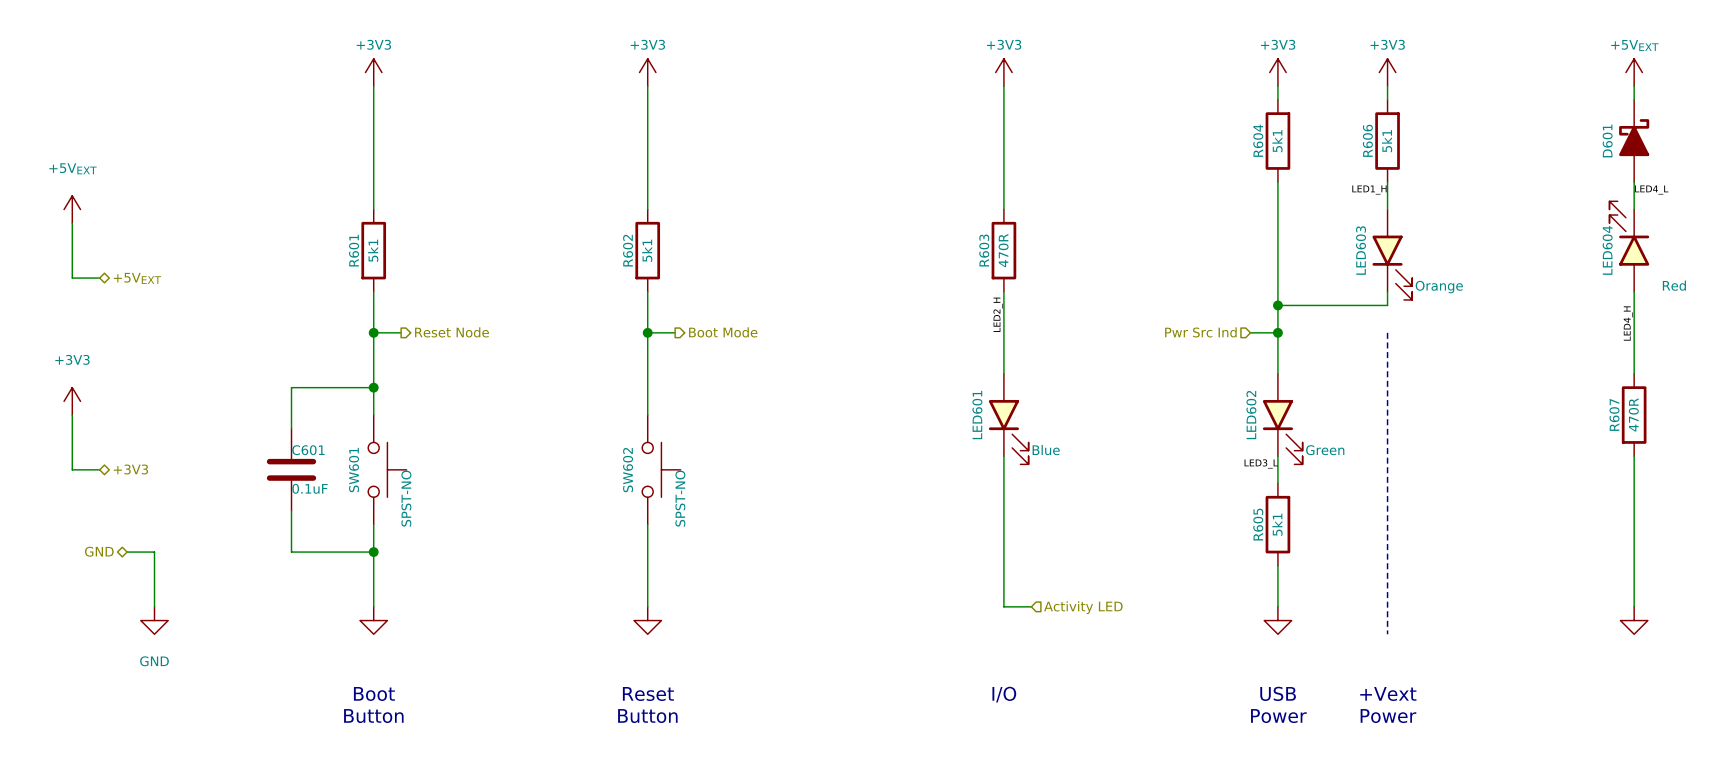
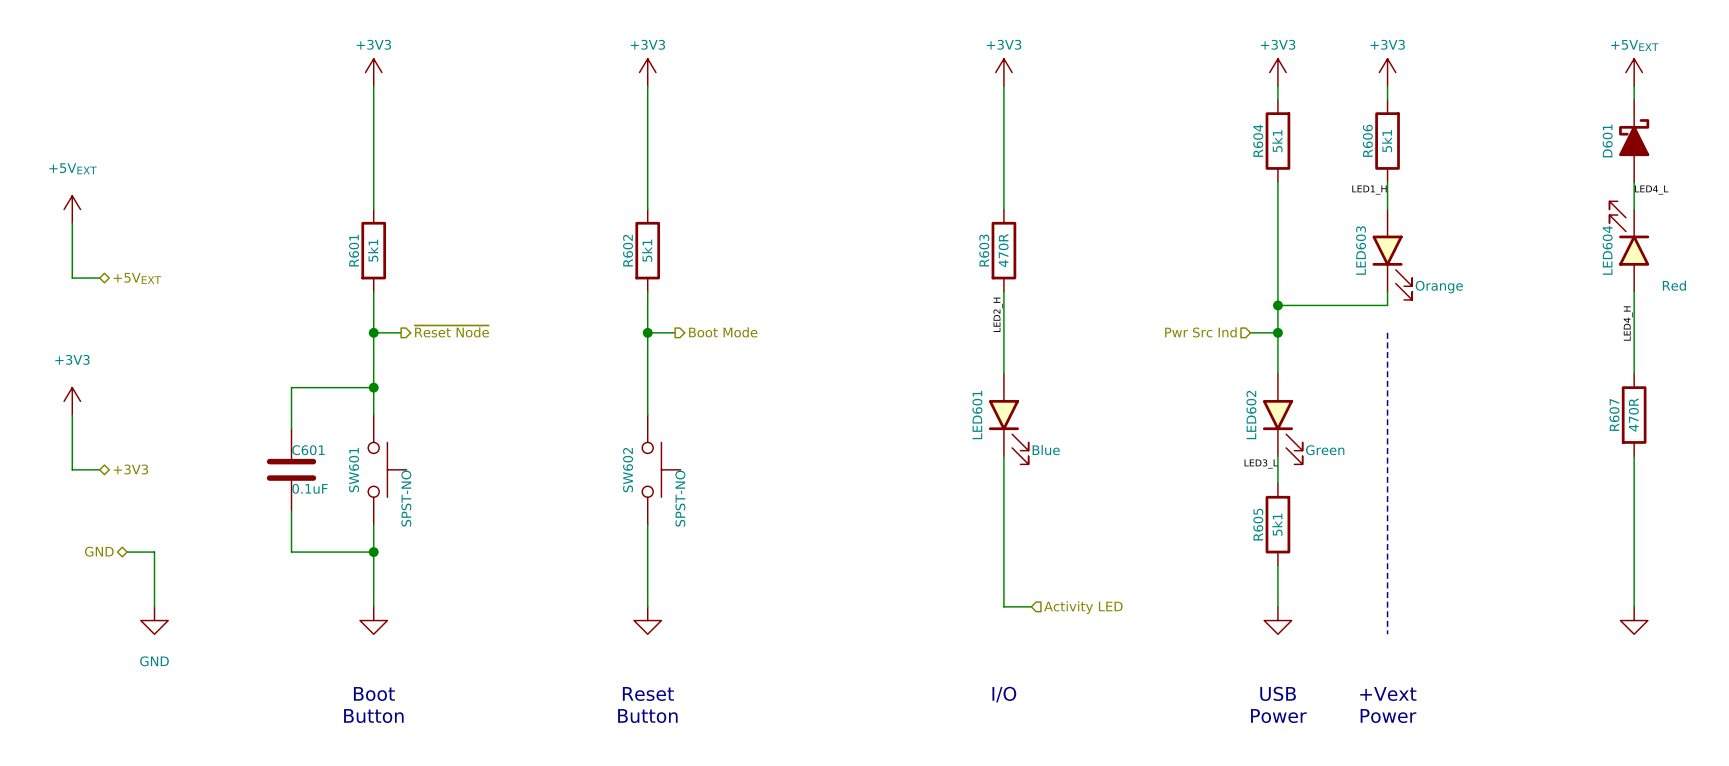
hierarchical label: Reset Node (452, 332) -> ~{Reset Node} (451, 331)

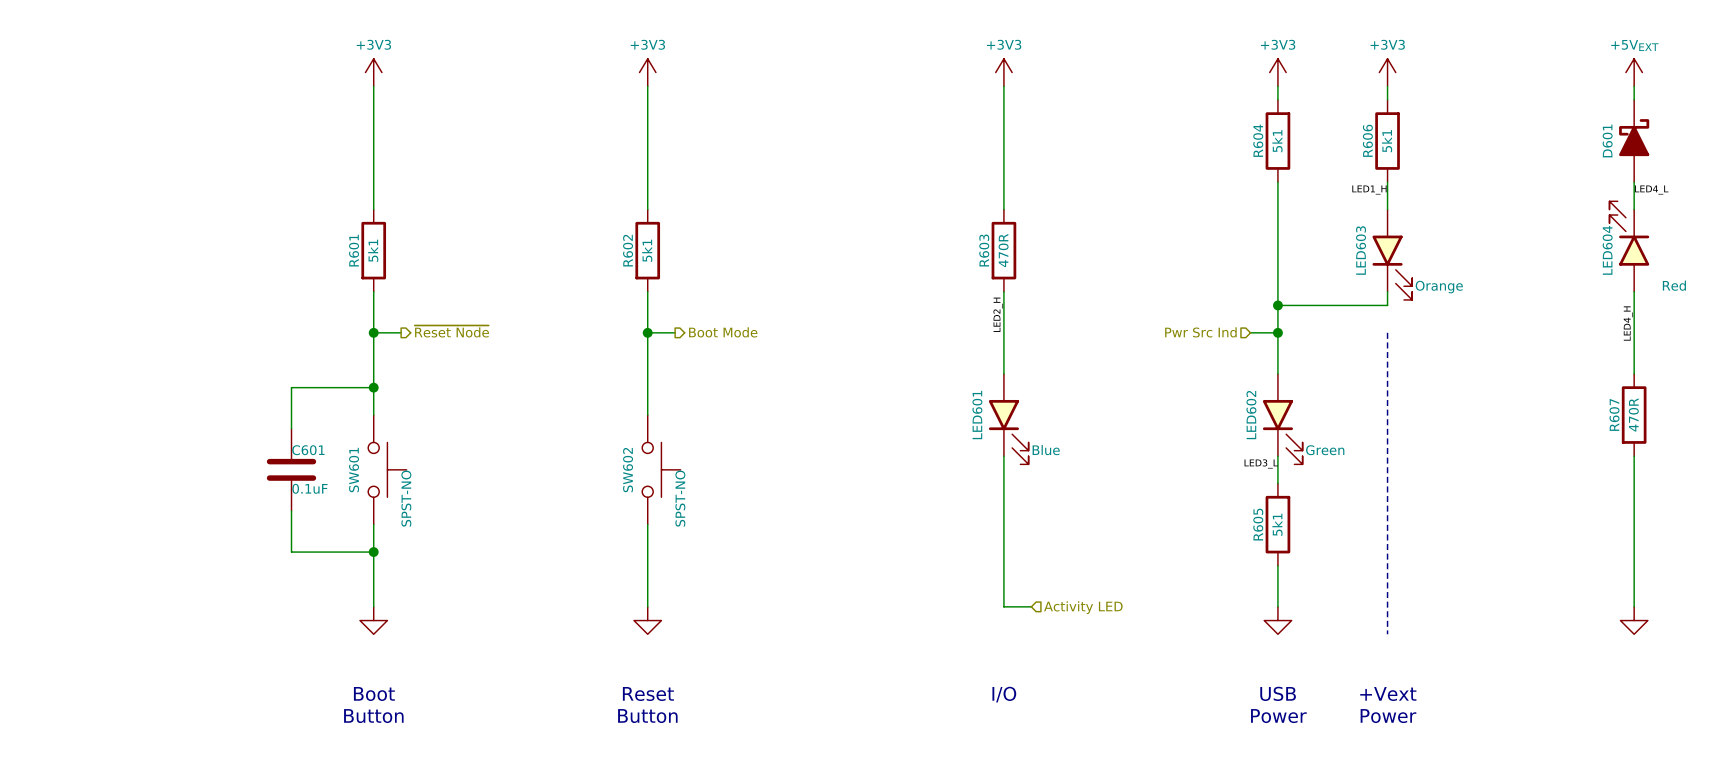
power symbol: +5VEXT (72, 209) -> none
wire: (72, 223) (72, 278) (99, 278) -> none
hierarchical label: +5VEXT (137, 278) -> none
power symbol: +3V3 (72, 401) -> none
wire: (72, 415) (72, 469) (99, 469) -> none
hierarchical label: +3V3 (130, 469) -> none
hierarchical label: GND (99, 551) -> none
wire: (127, 552) (154, 552) (154, 606) -> none
power symbol: GND (154, 620) -> none

